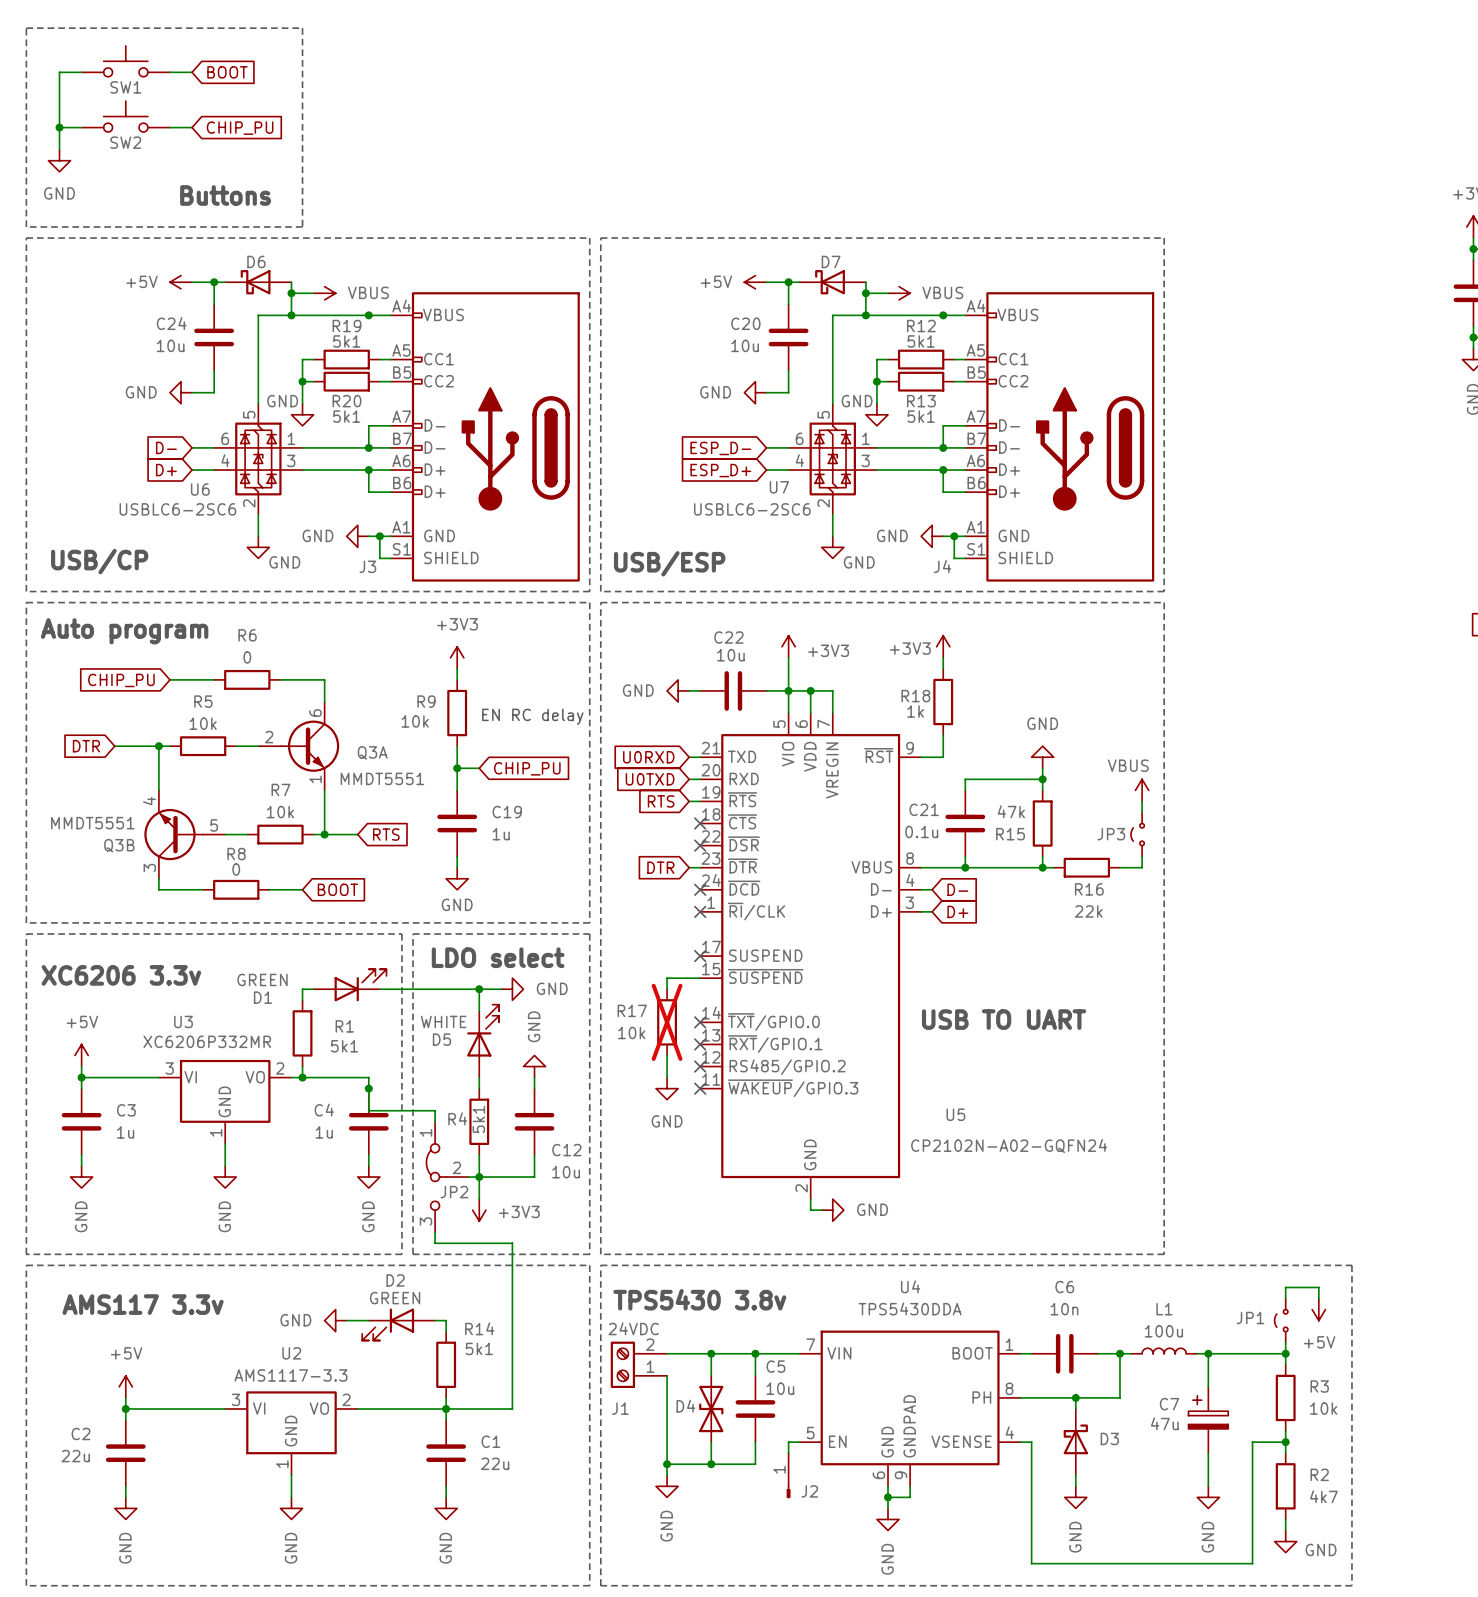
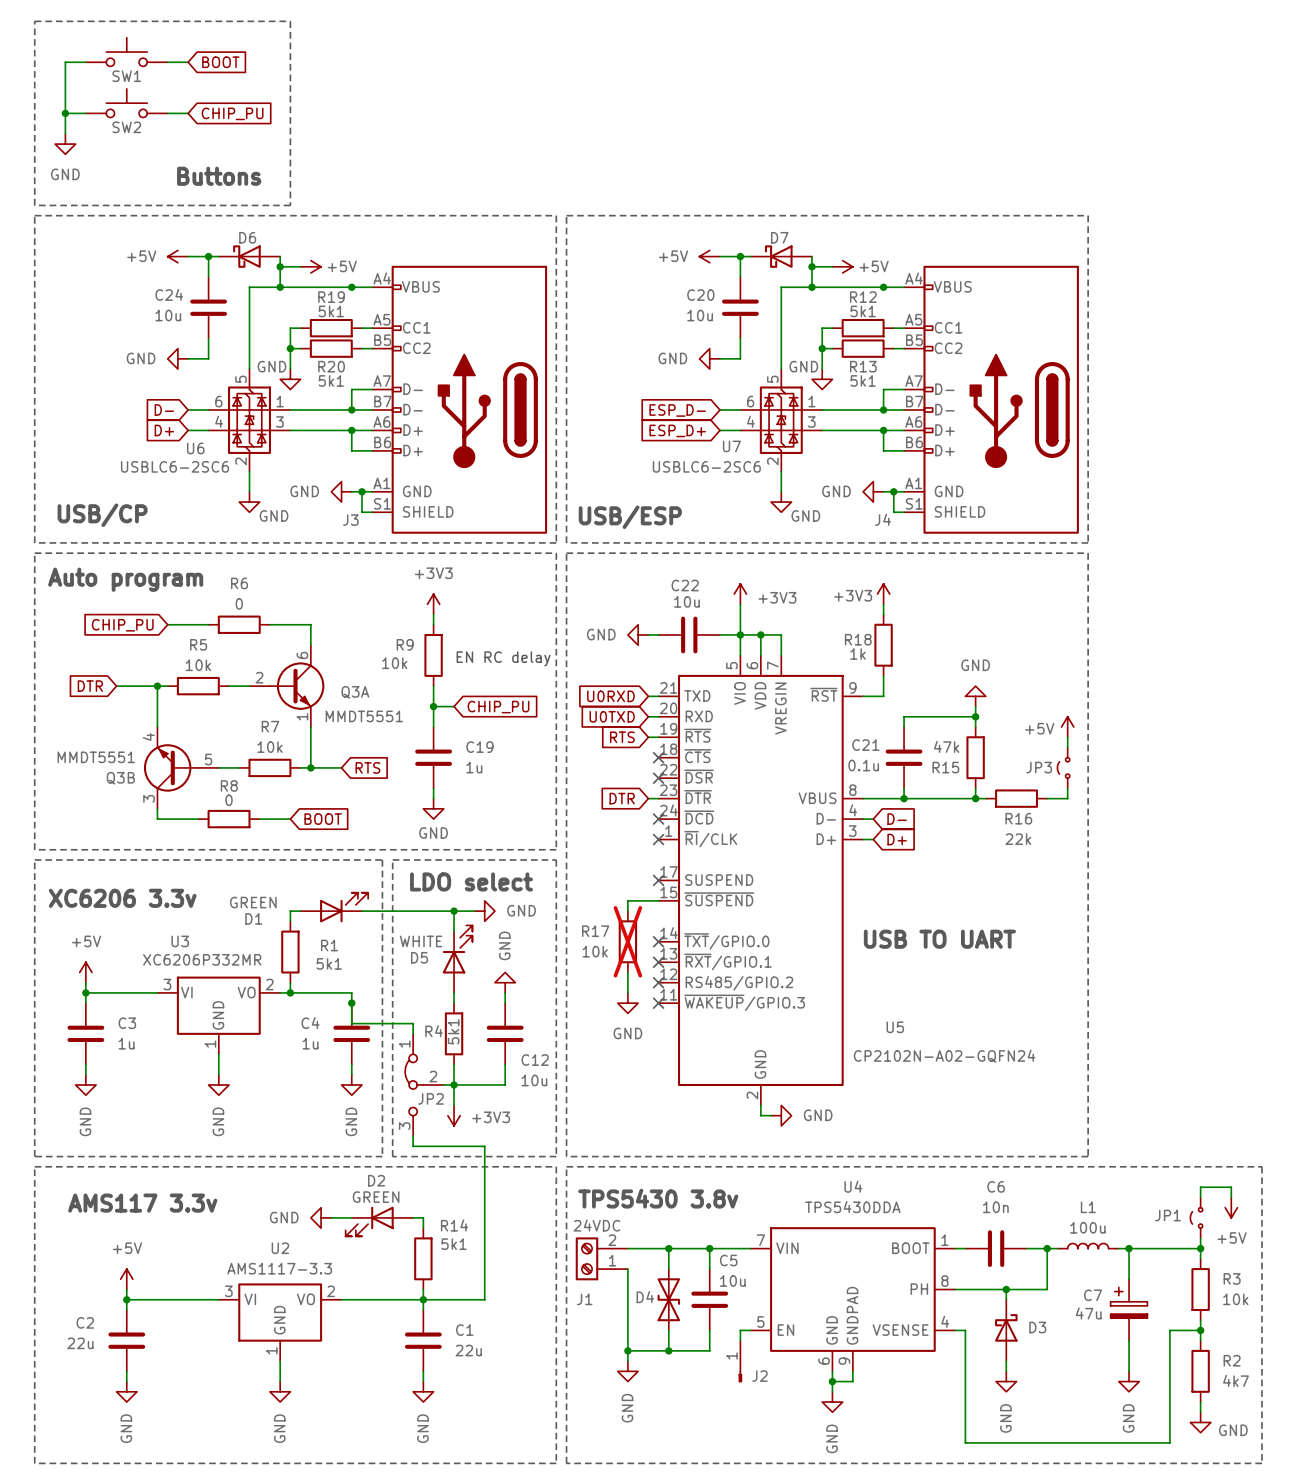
power symbol: VBUS (324, 293) -> +5V (310, 266)
power symbol: VBUS (899, 293) -> +5V (842, 266)
power symbol: VBUS (1142, 790) -> +5V (1067, 727)

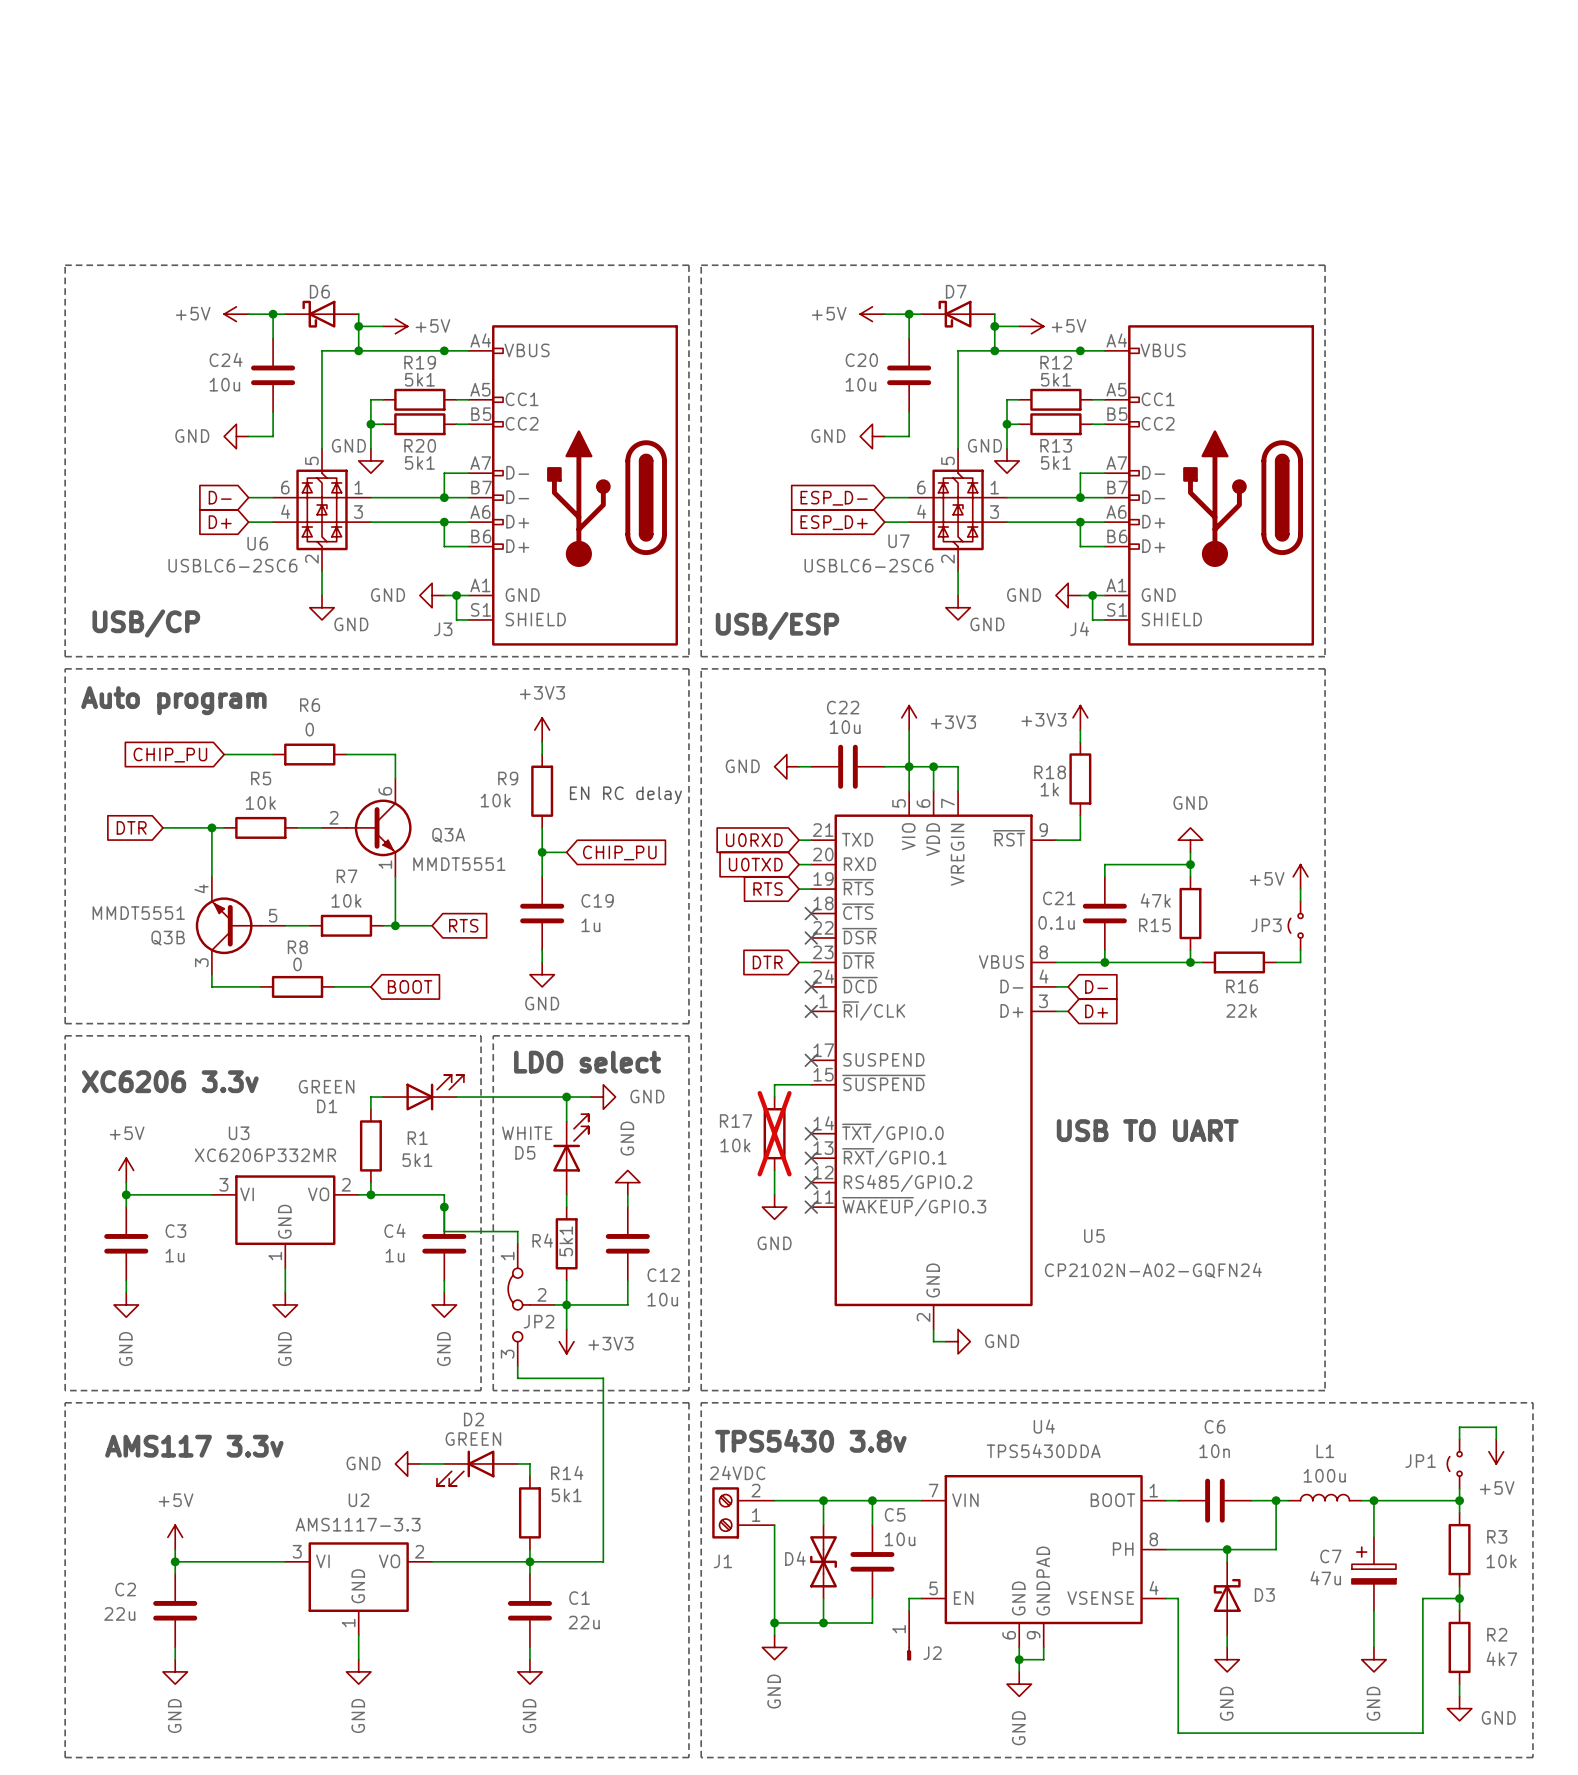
line: (34, 21) (290, 21) (290, 205) (34, 205) (34, 21) -> none
SW1: (126, 52) -> none
wire: (85, 62) (65, 62) (65, 133) -> none
wire: (167, 62) (188, 62) -> none
global label: BOOT (220, 62) -> none
SW2: (126, 103) -> none
wire: (65, 113) (85, 113) -> none
junction: (65, 113) -> none
wire: (167, 113) (188, 113) -> none
global label: CHIP_PU (232, 113) -> none
power symbol: GND (65, 144) -> none
text: Buttons (219, 176) -> none

